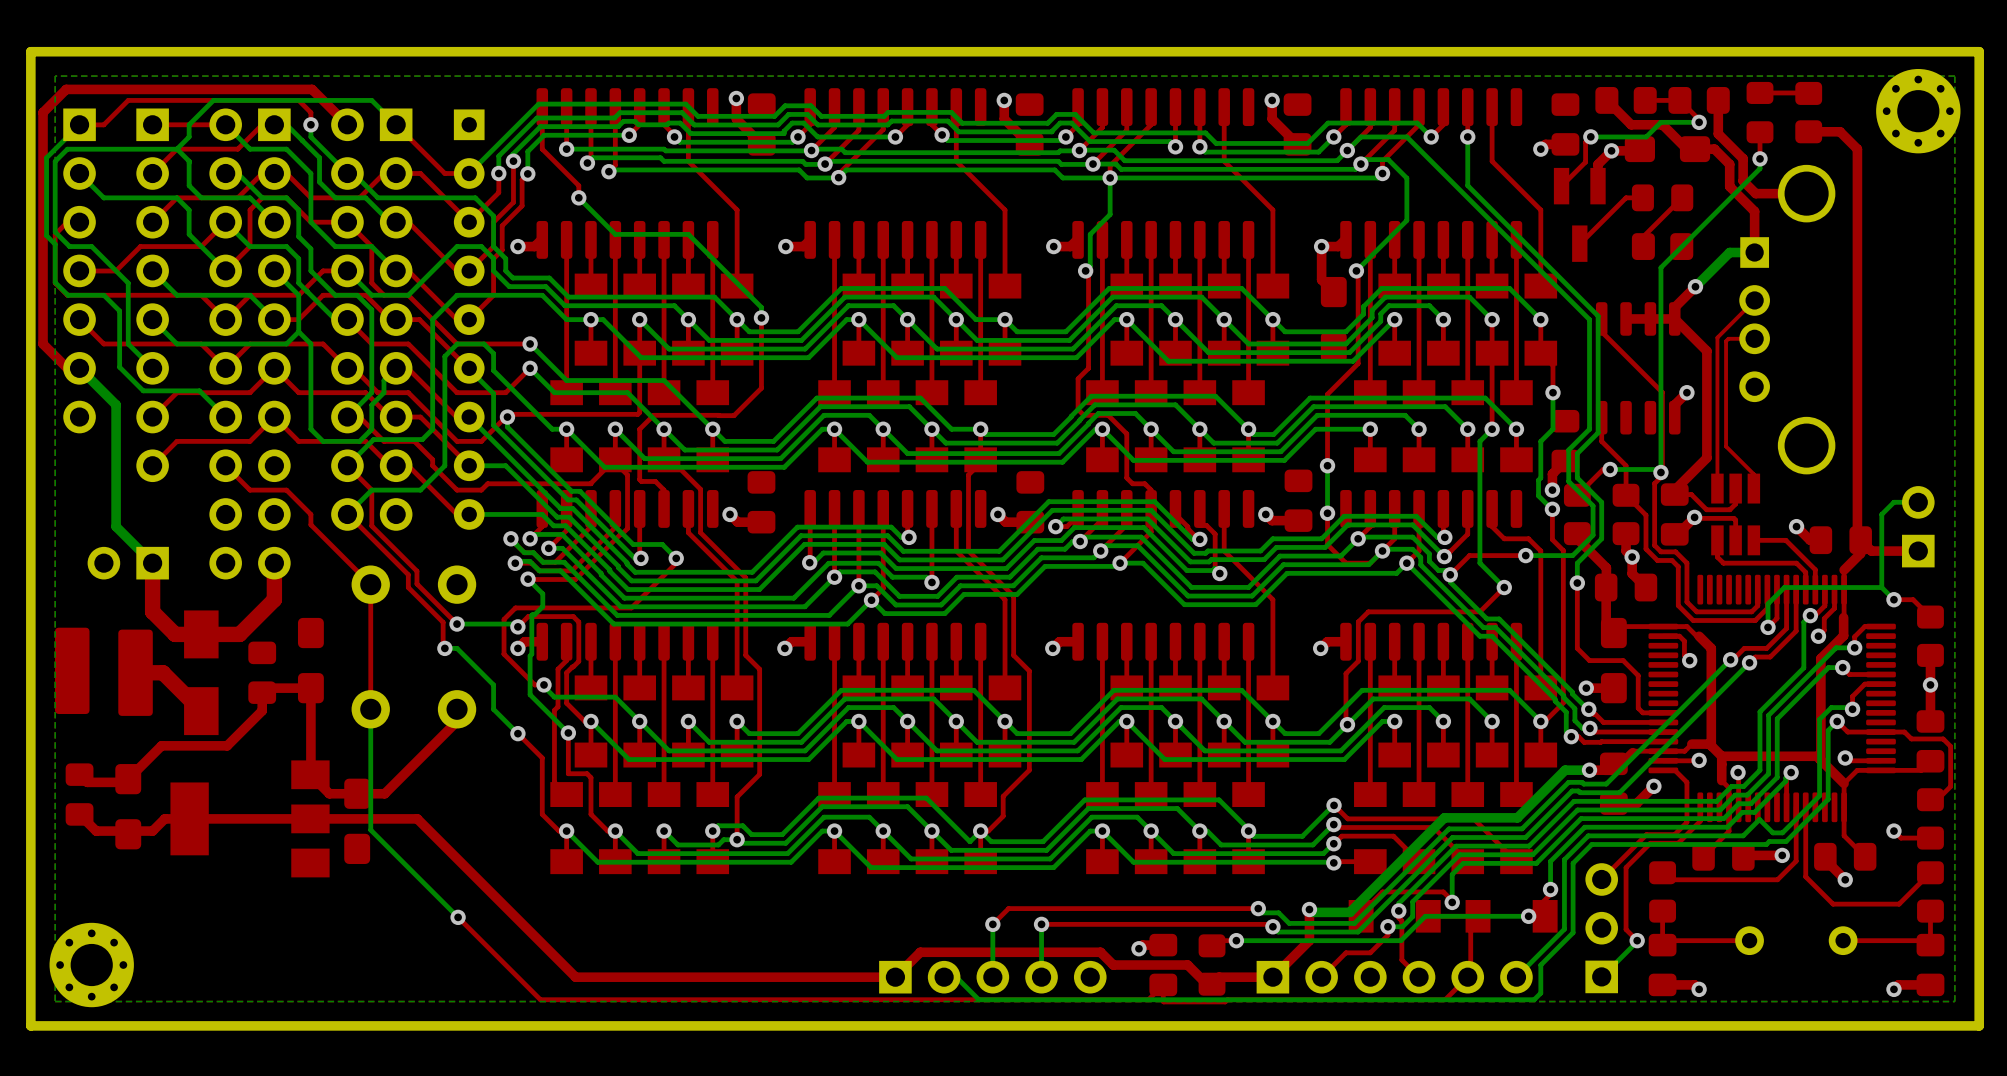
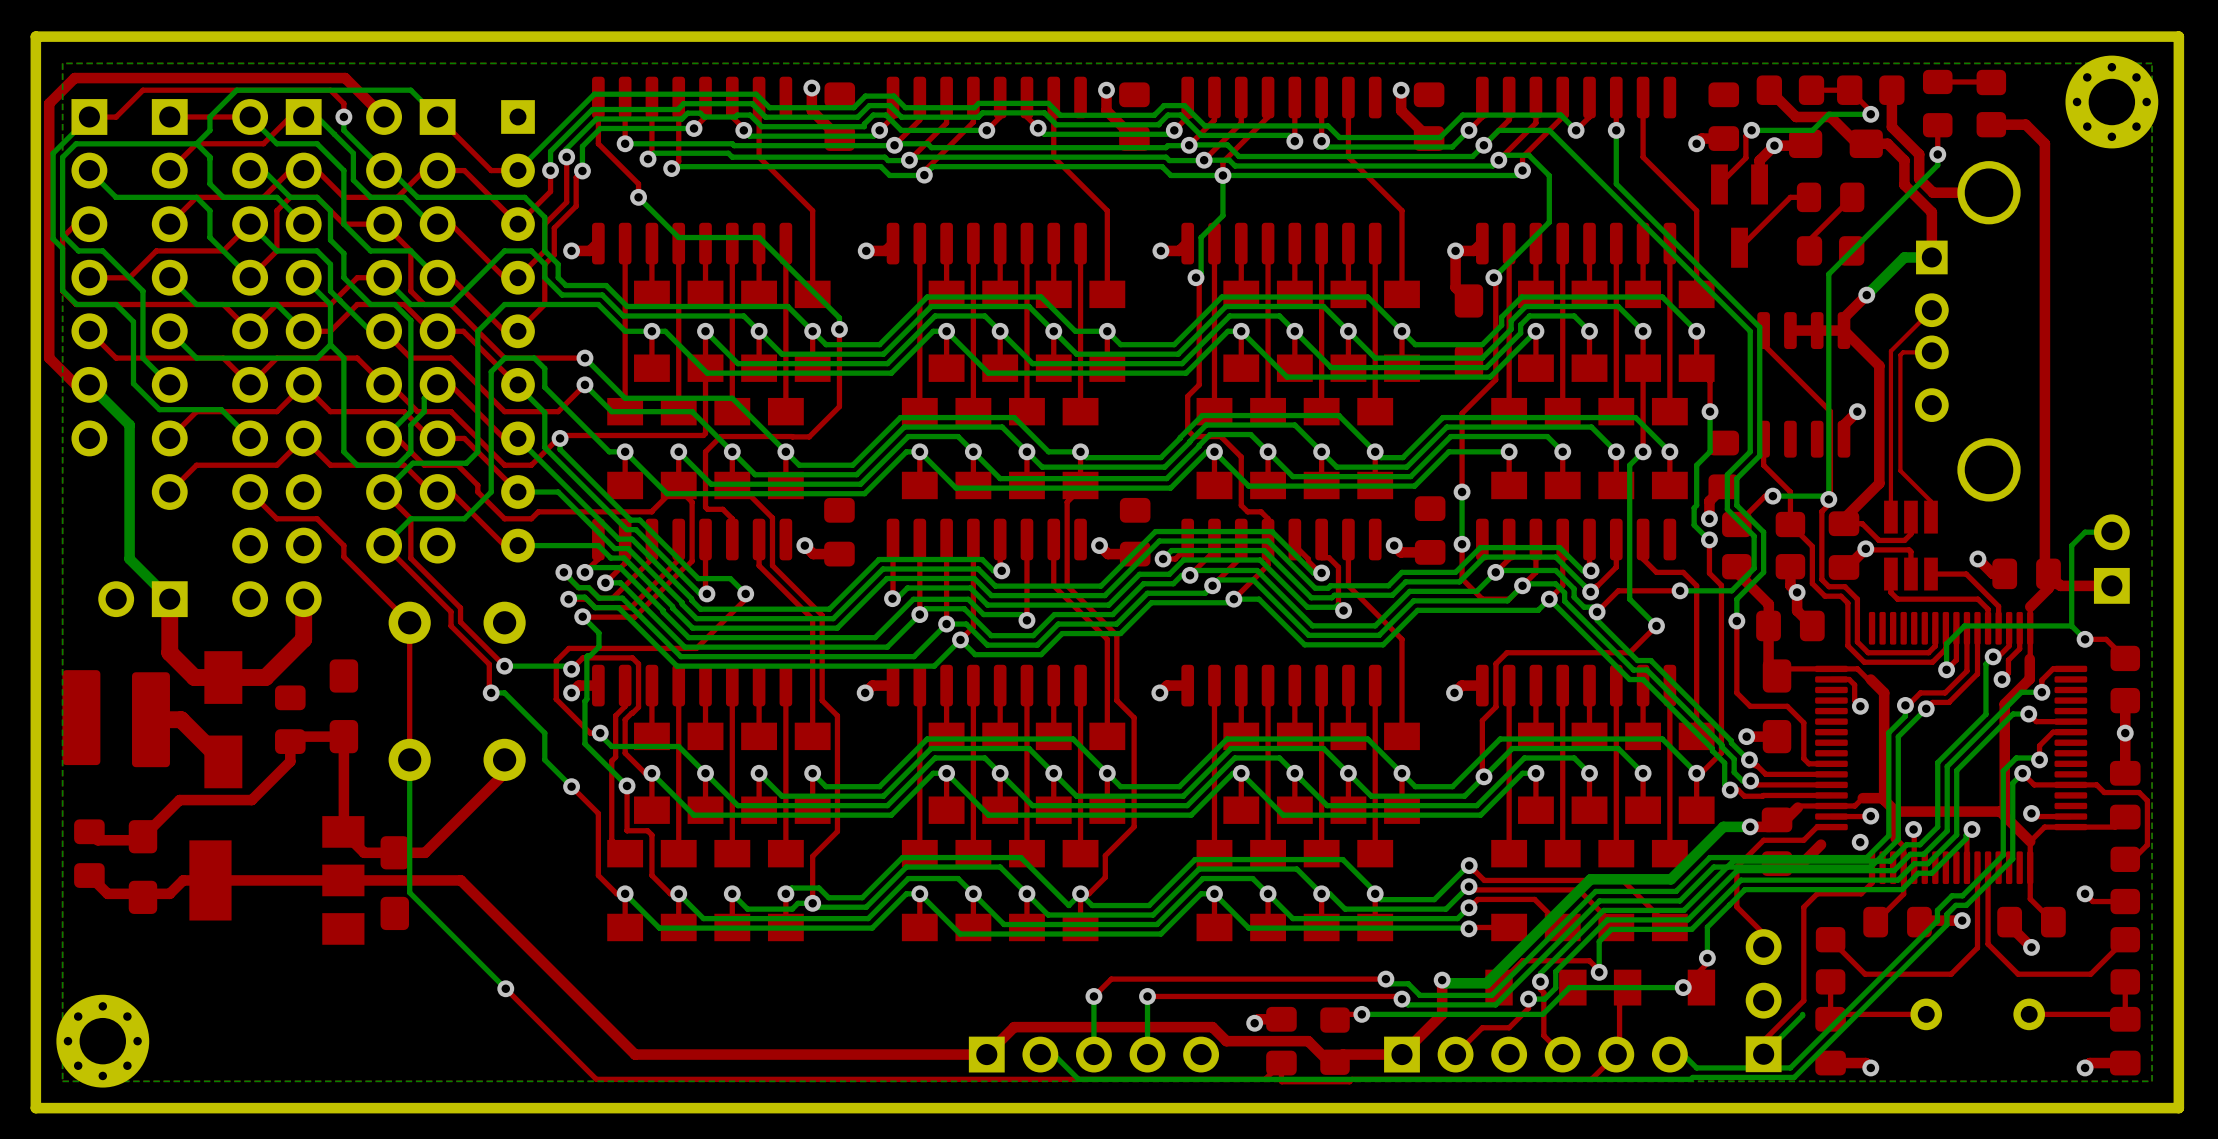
bottom track: (1730, 659) (1606, 784) (1568, 782) (1552, 798) -> (1905, 705) (1905, 716) (1888, 732) (1888, 835) (1866, 857) (1709, 857)
bottom track: (1724, 688) (1619, 792) (1572, 790) (1556, 806) -> (1898, 736) (1898, 839) (1870, 867) (1713, 867)
top track: (1663, 770) (1674, 770) (1686, 782) (1686, 822) (1674, 834) (1646, 834) (1601, 879) -> (1831, 826) (1817, 826) (1803, 840) (1763, 840) (1736, 867) (1736, 906) (1763, 933)
via position: (1653, 786) -> (1860, 842)
top track: (1690, 831) (1678, 843) (1650, 843) (1626, 867) (1626, 929) (1637, 940) -> (1861, 893) (1817, 893) (1803, 907) (1803, 1000) (1763, 1040)
bottom track: (1772, 832) (1759, 819) (1743, 835) (1588, 835) (1564, 859) (1564, 929) (1516, 977) -> (1951, 895) (1937, 910) (1937, 920) (1790, 1067) (1696, 1067) (1669, 1041) (1669, 1054)
bottom track: (1776, 841) (1769, 841) (1766, 844) (1591, 844) (1573, 863) (1573, 932) (1540, 965) (1540, 993) (1534, 999) -> (1955, 905) (1946, 914) (1946, 924) (1794, 1077) (1692, 1077) (1689, 1079)
top track: (1796, 861) (1777, 879) (1669, 879) -> (1977, 926) (1977, 947) (1951, 974) (1865, 974) (1838, 947)
via: (1637, 940) -> none

